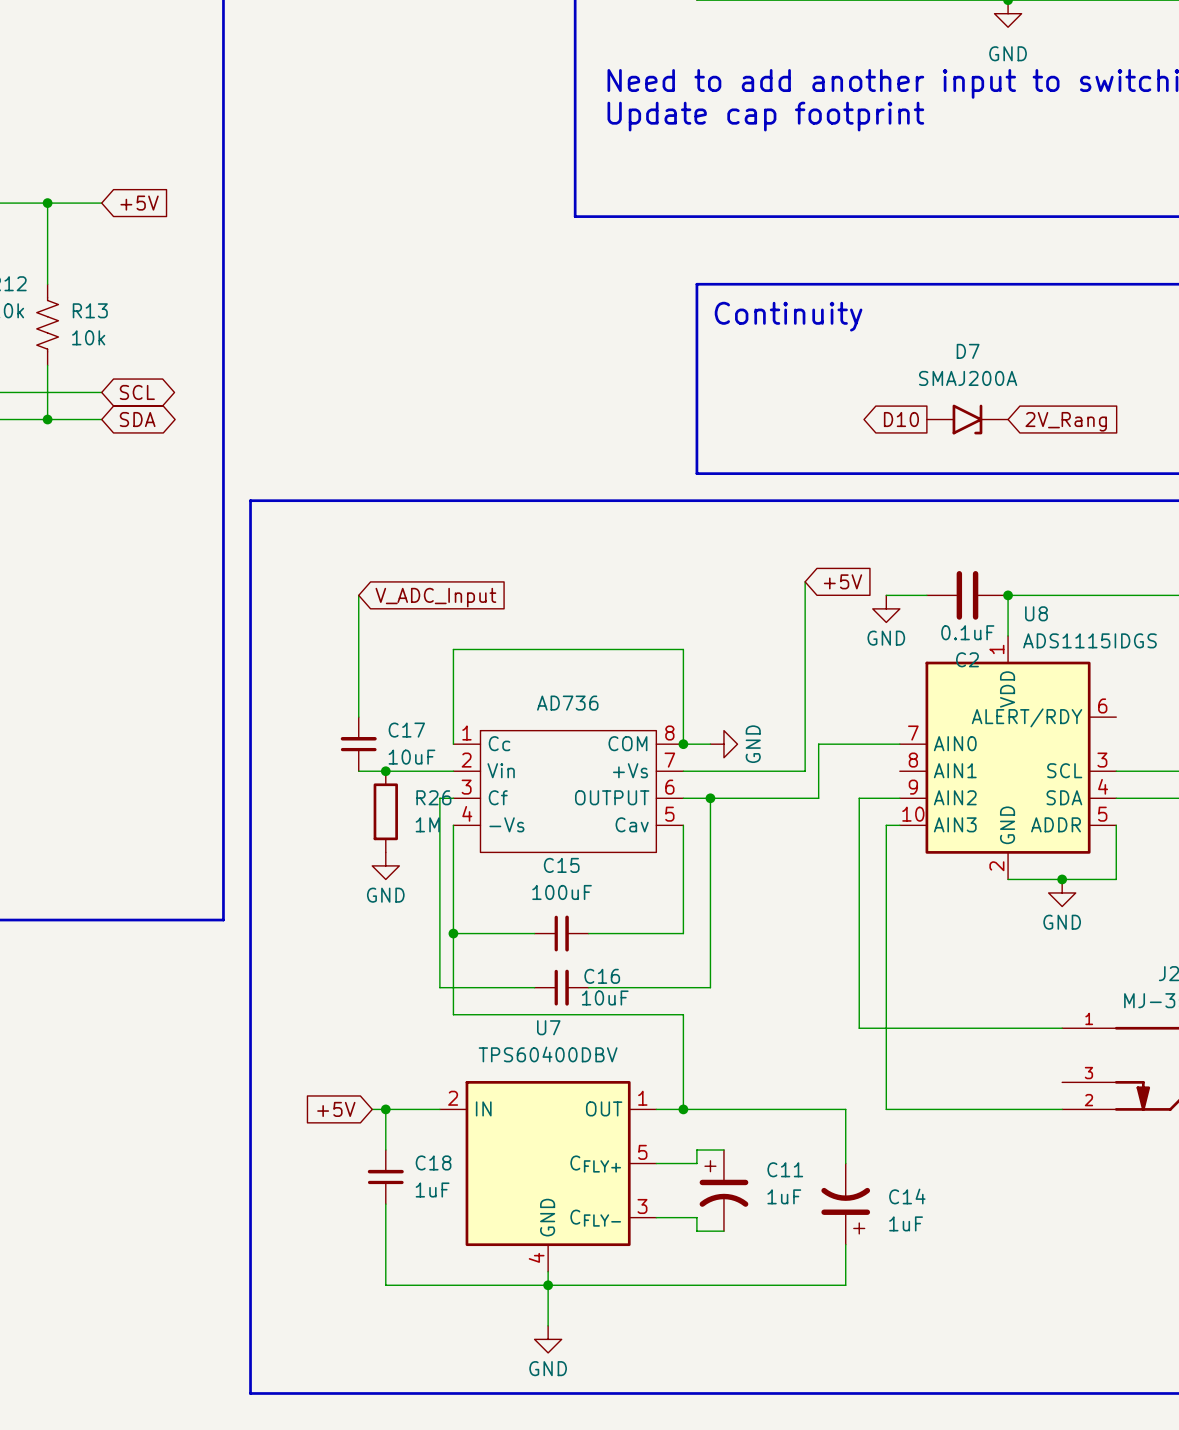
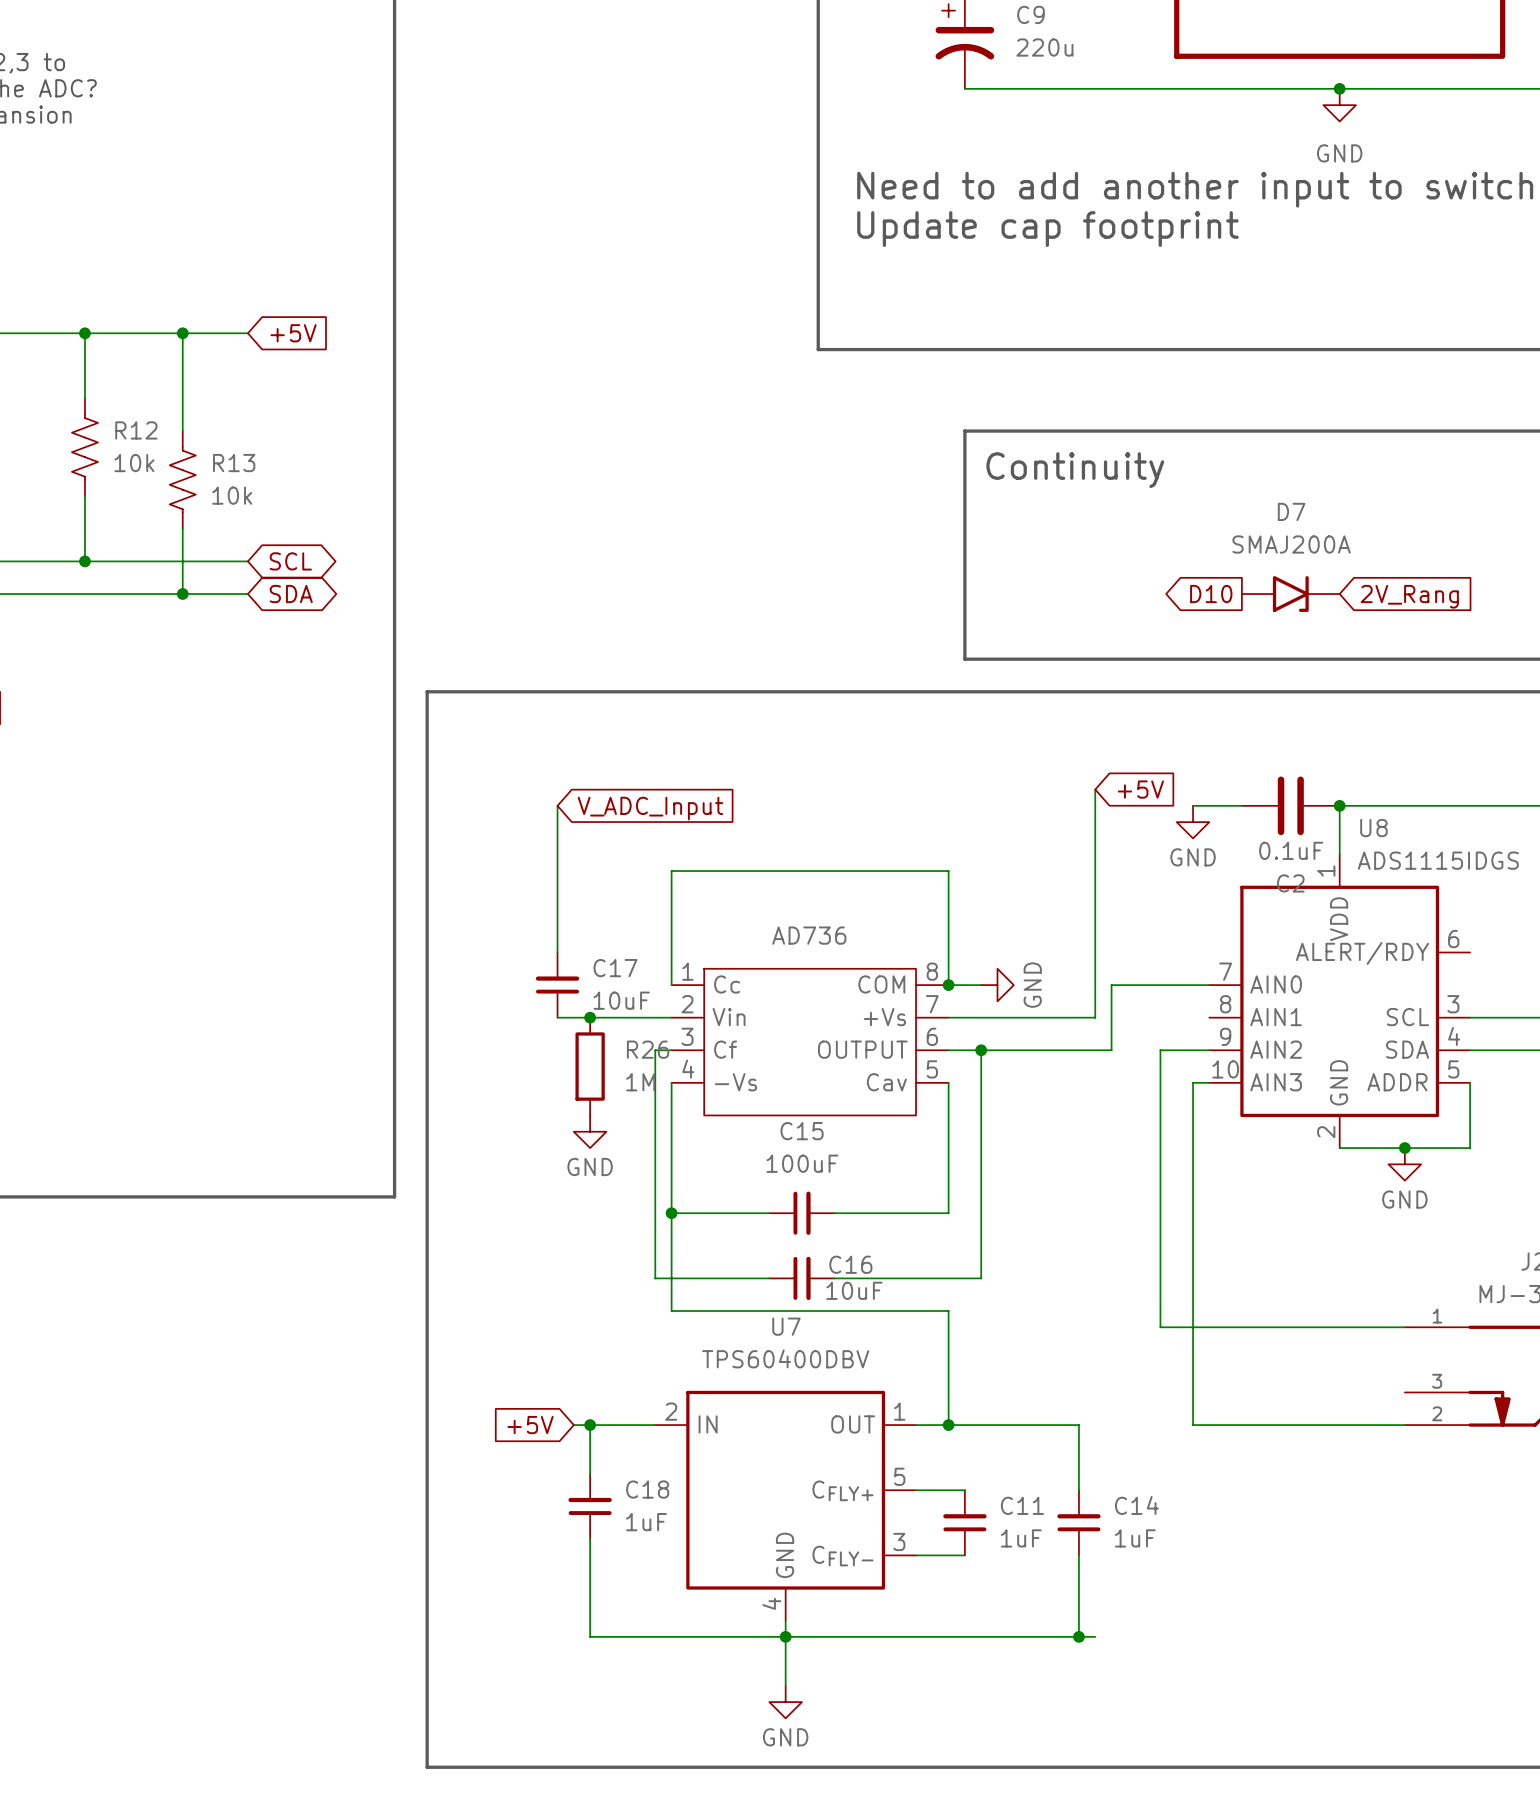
wire: (791, 1109) (845, 1109) (845, 1163) -> (1078, 1425) (1078, 1490)
C11 symbol: [699, 1150, 749, 1232] -> [943, 1490, 987, 1556]
wire: (723, 1150) (696, 1150) (696, 1163) -> none
C14 symbol: [821, 1163, 871, 1245] -> [1057, 1490, 1101, 1556]
wire: (696, 1217) (696, 1231) (723, 1231) -> none
wire: none -> (1078, 1555) (1078, 1636)
wire: (845, 1244) (845, 1285) (805, 1285) -> none
junction: none -> (1078, 1636)

